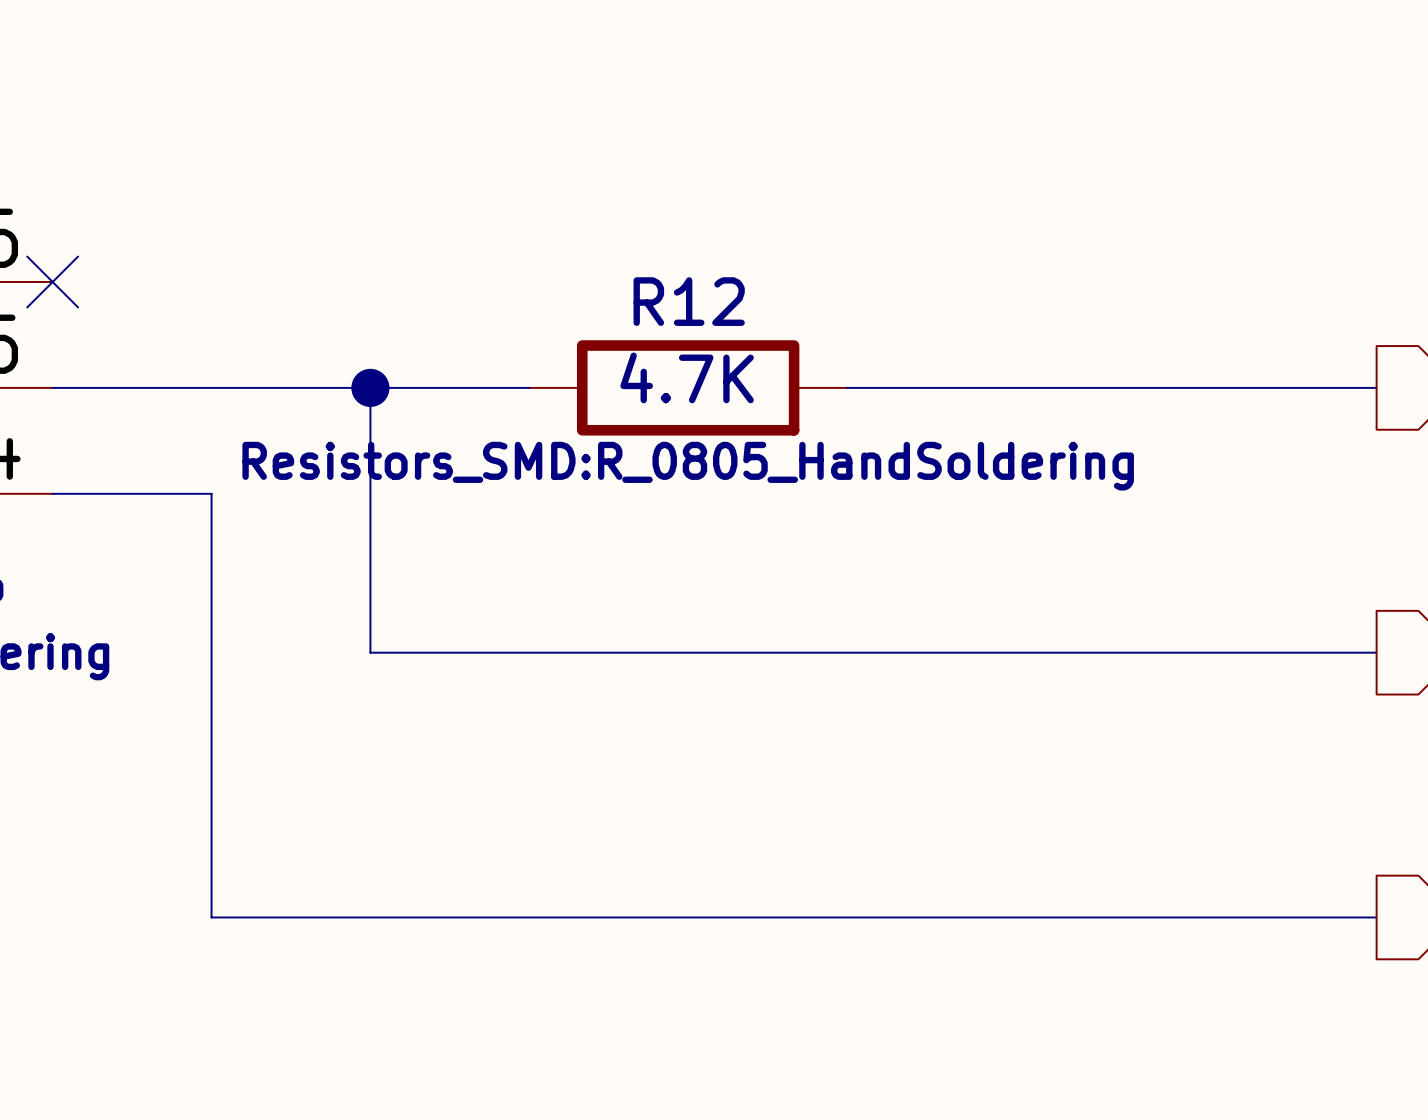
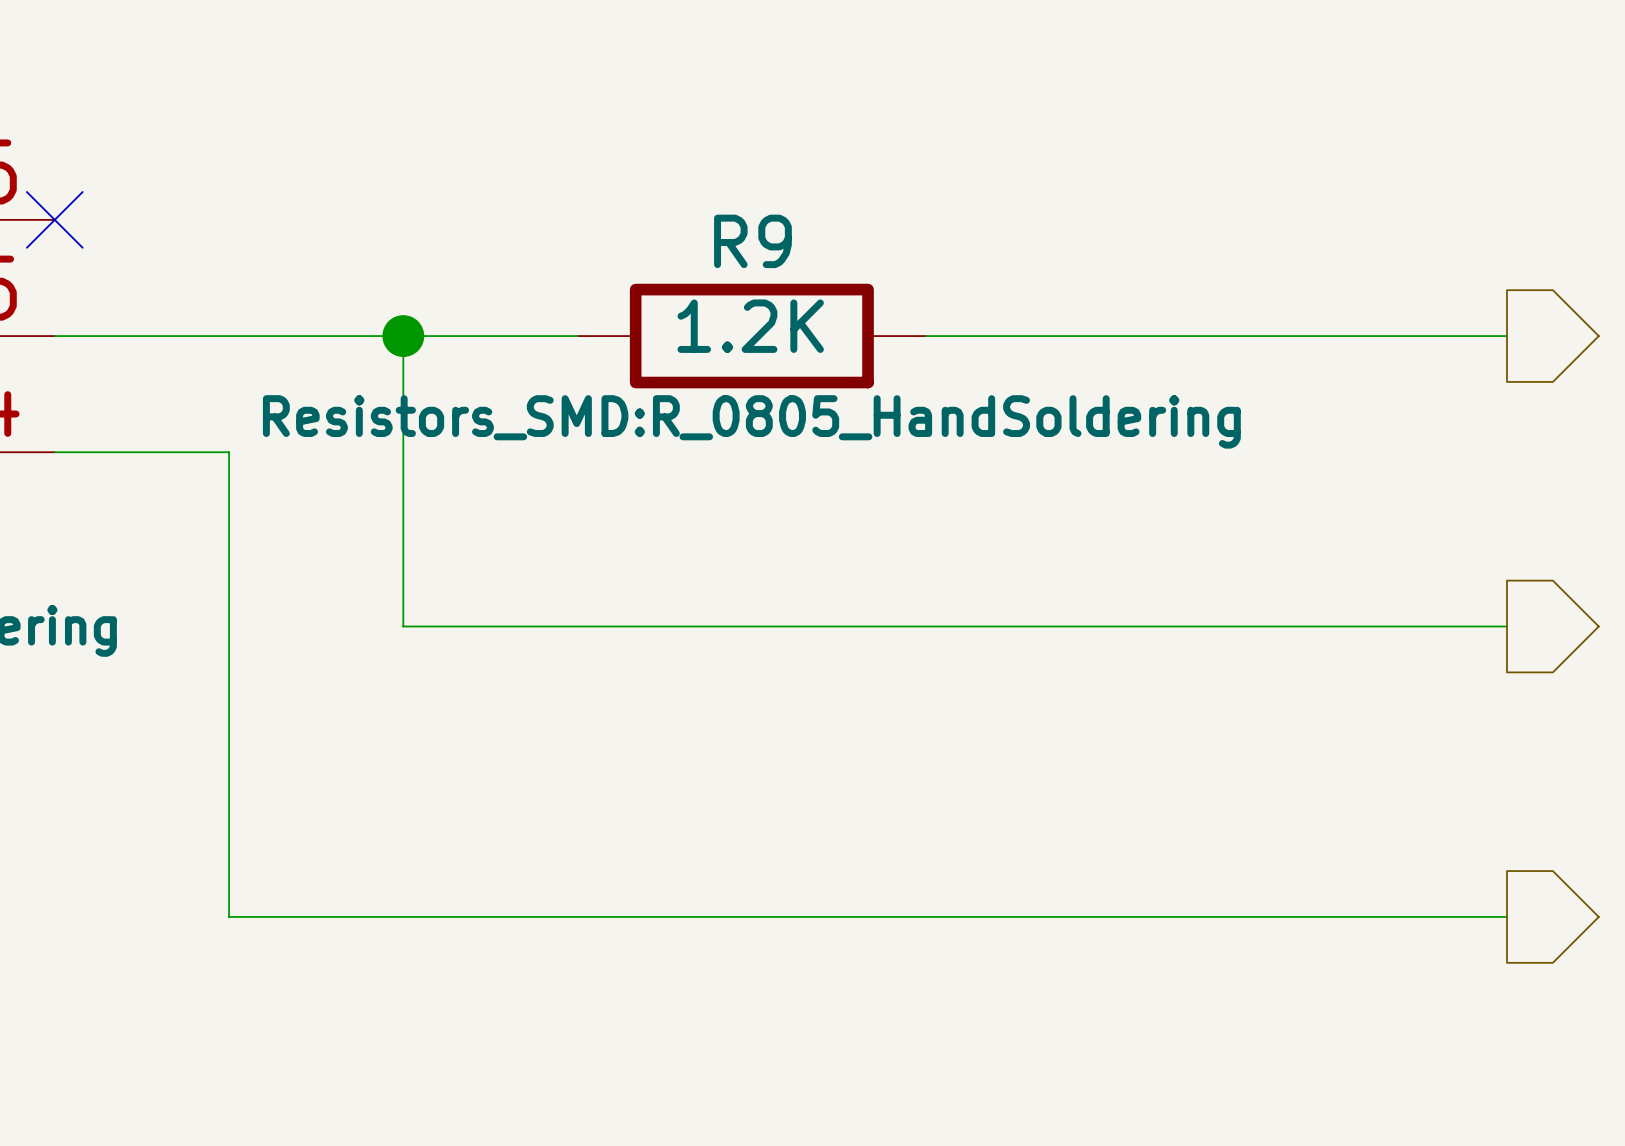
R12 name: R12 (689, 301) -> R9 (752, 241)
R12 value: 4.7K (687, 377) -> 1.2K (750, 326)

